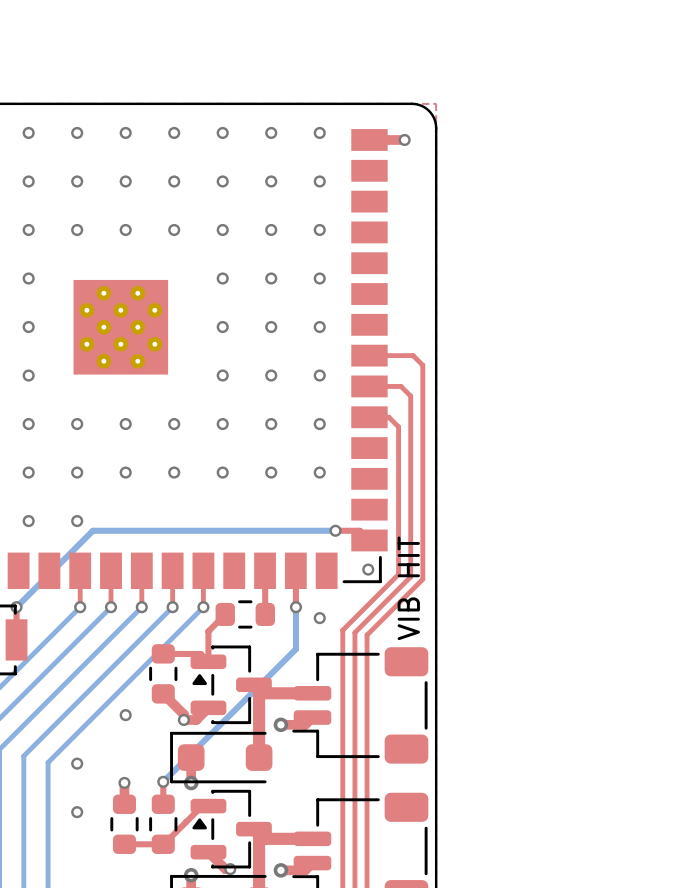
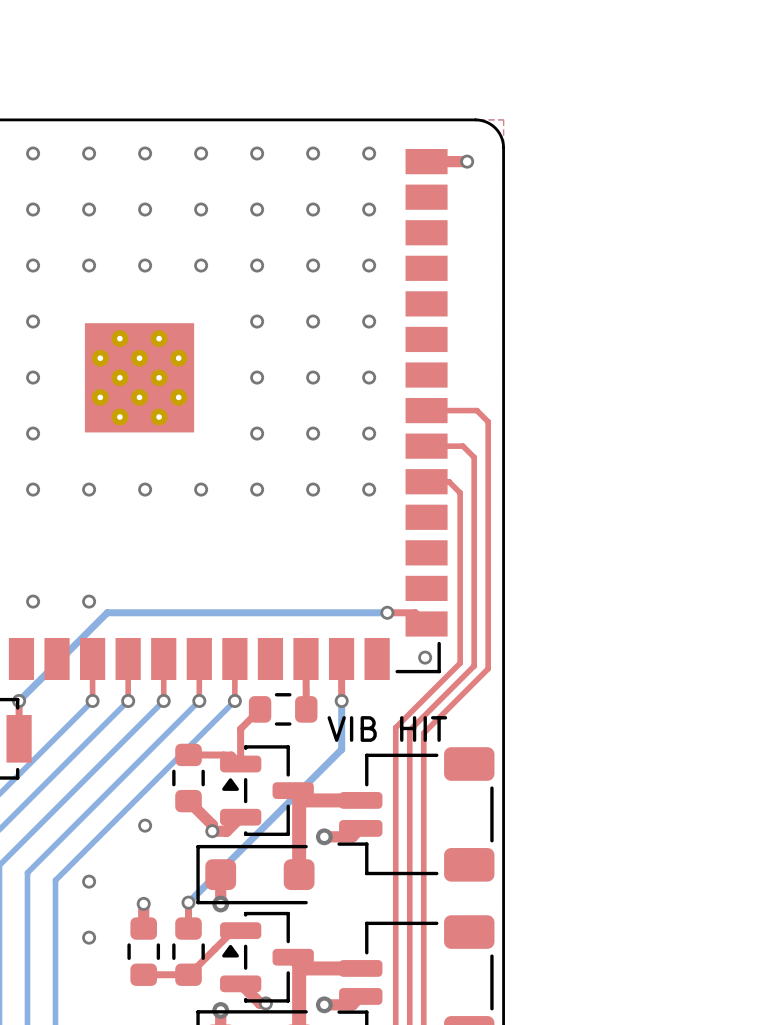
via: (28, 472) -> none
via: (77, 472) -> none
via: (125, 472) -> none
via: (174, 472) -> none
via: (222, 472) -> none
via: (271, 472) -> none
via: (319, 472) -> none
text rotation: 0° (408, 588) -> 90° clockwise (387, 729)
via: (319, 618) -> none

